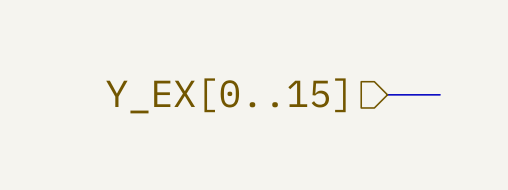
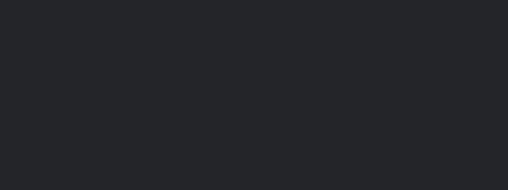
bus: (387, 94) (440, 94) -> none
hierarchical label: Y_EX[0..15] (225, 95) -> none

